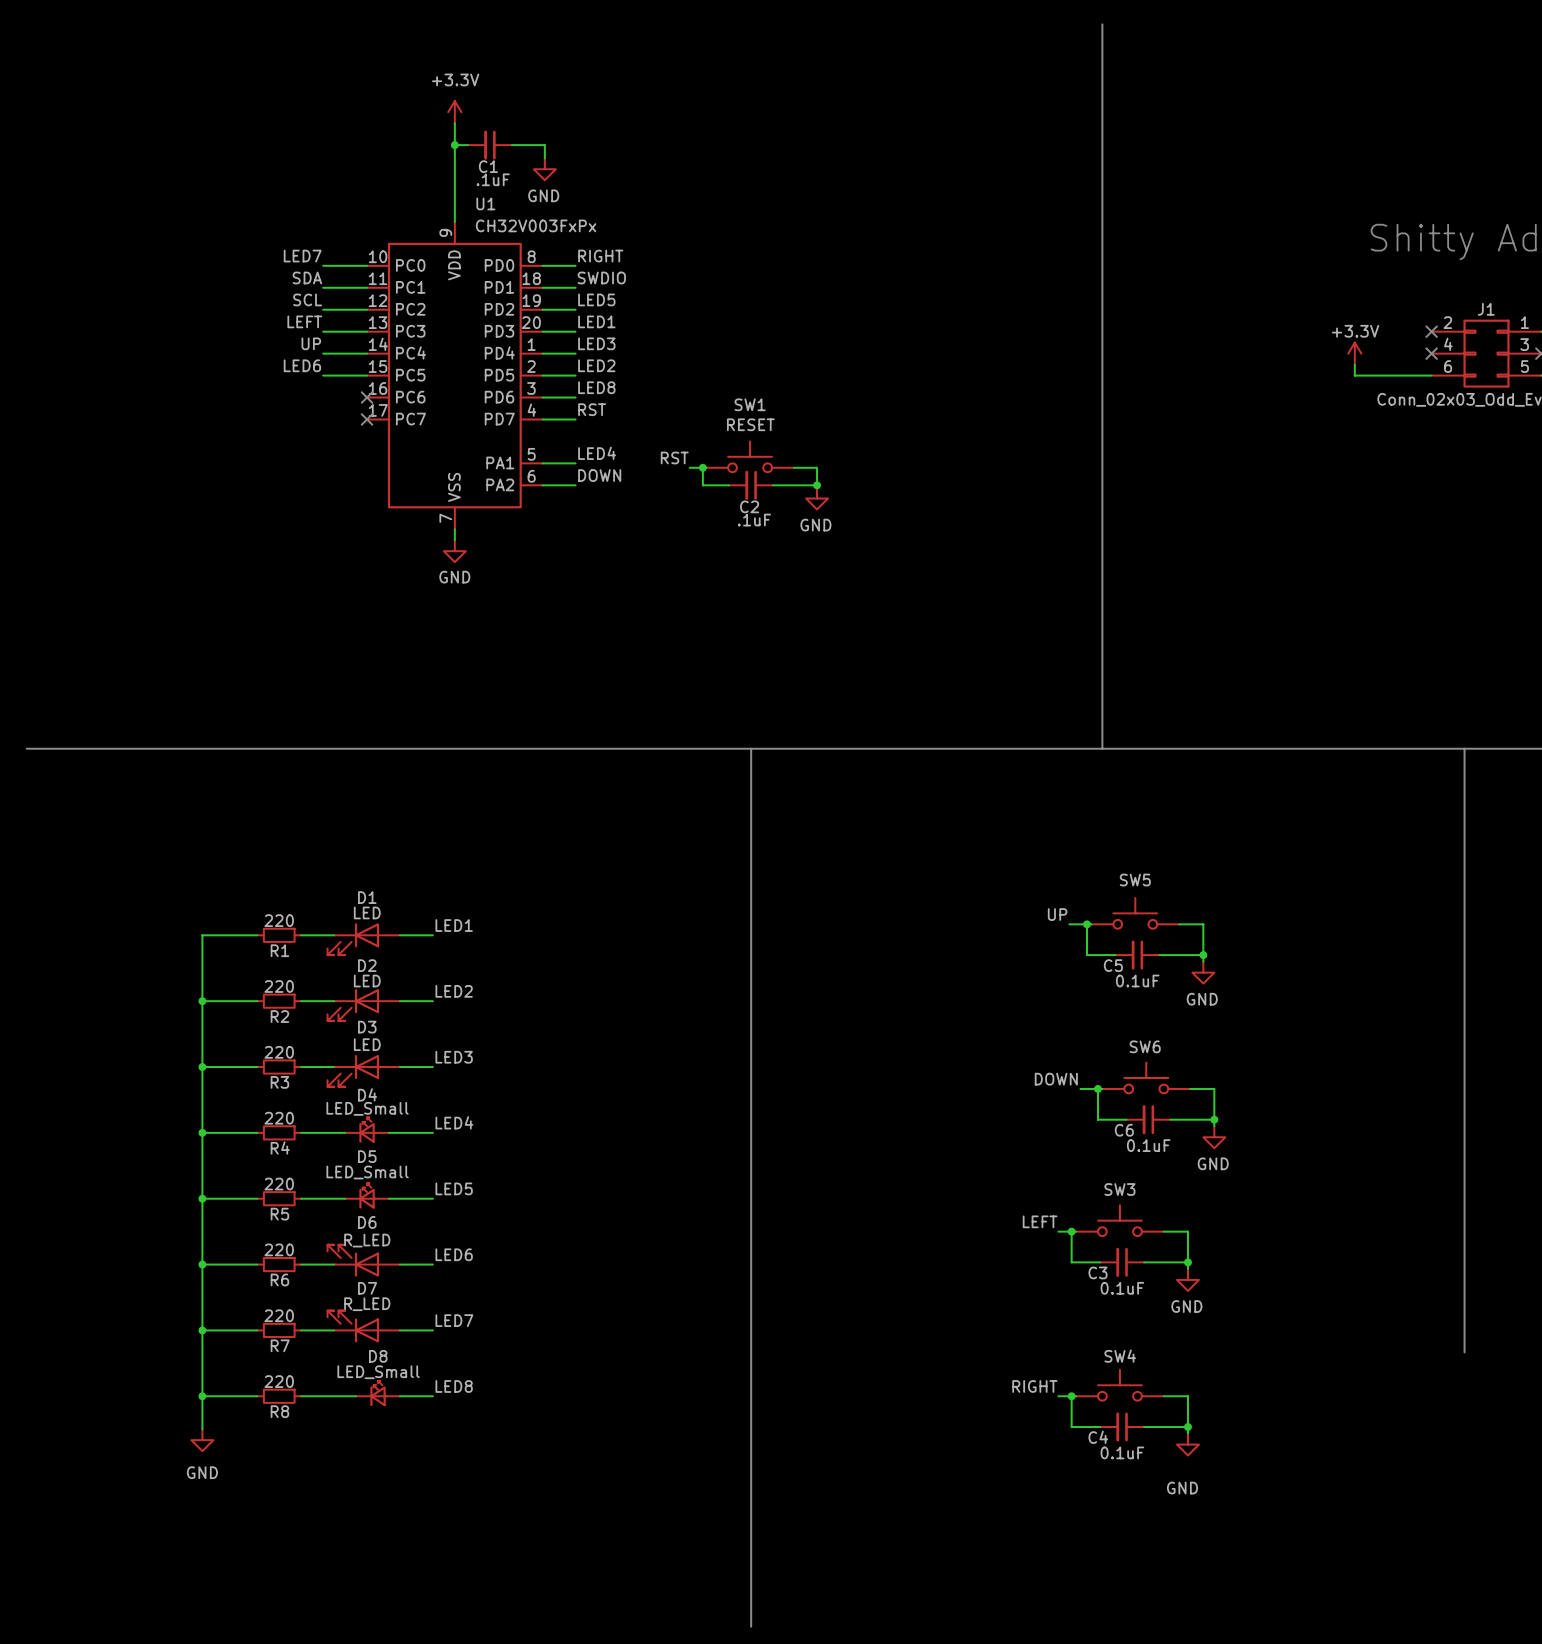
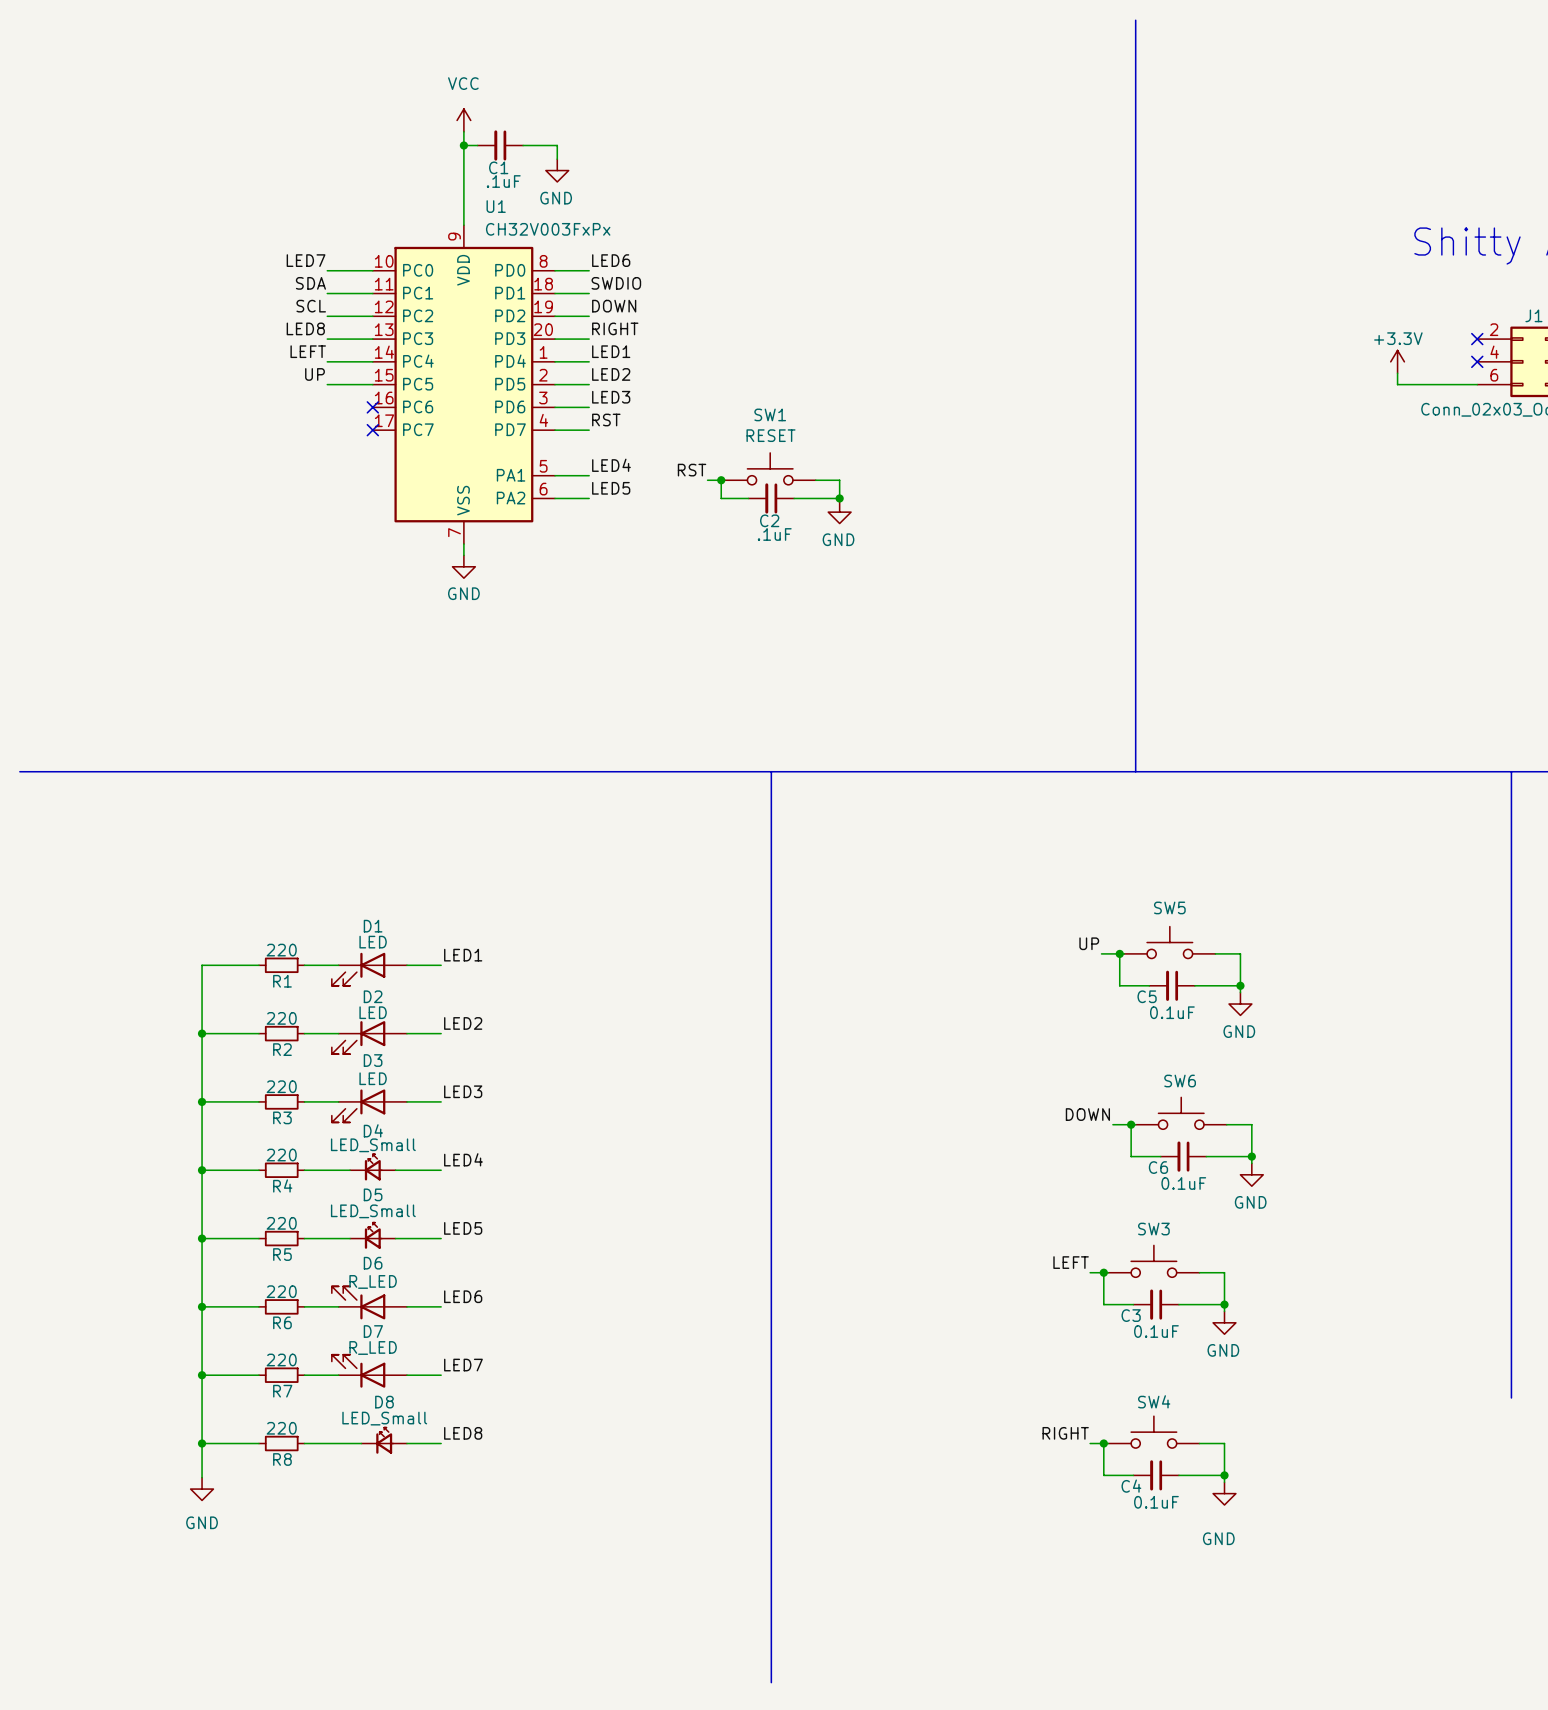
power symbol: +3.3V (454, 112) -> none
power symbol: none -> VCC (463, 120)
label: RIGHT (600, 256) -> LED6 (611, 260)
label: LED5 (596, 299) -> DOWN (614, 306)
label: LEFT (304, 321) -> LED8 (305, 328)
label: LED1 (596, 321) -> RIGHT (615, 328)
label: UP (311, 343) -> LEFT (308, 351)
label: LED3 (596, 343) -> LED1 (611, 351)
label: LED6 (302, 365) -> UP (314, 374)
label: LED8 (596, 387) -> LED3 (611, 397)
label: DOWN (599, 475) -> LED5 (611, 488)

